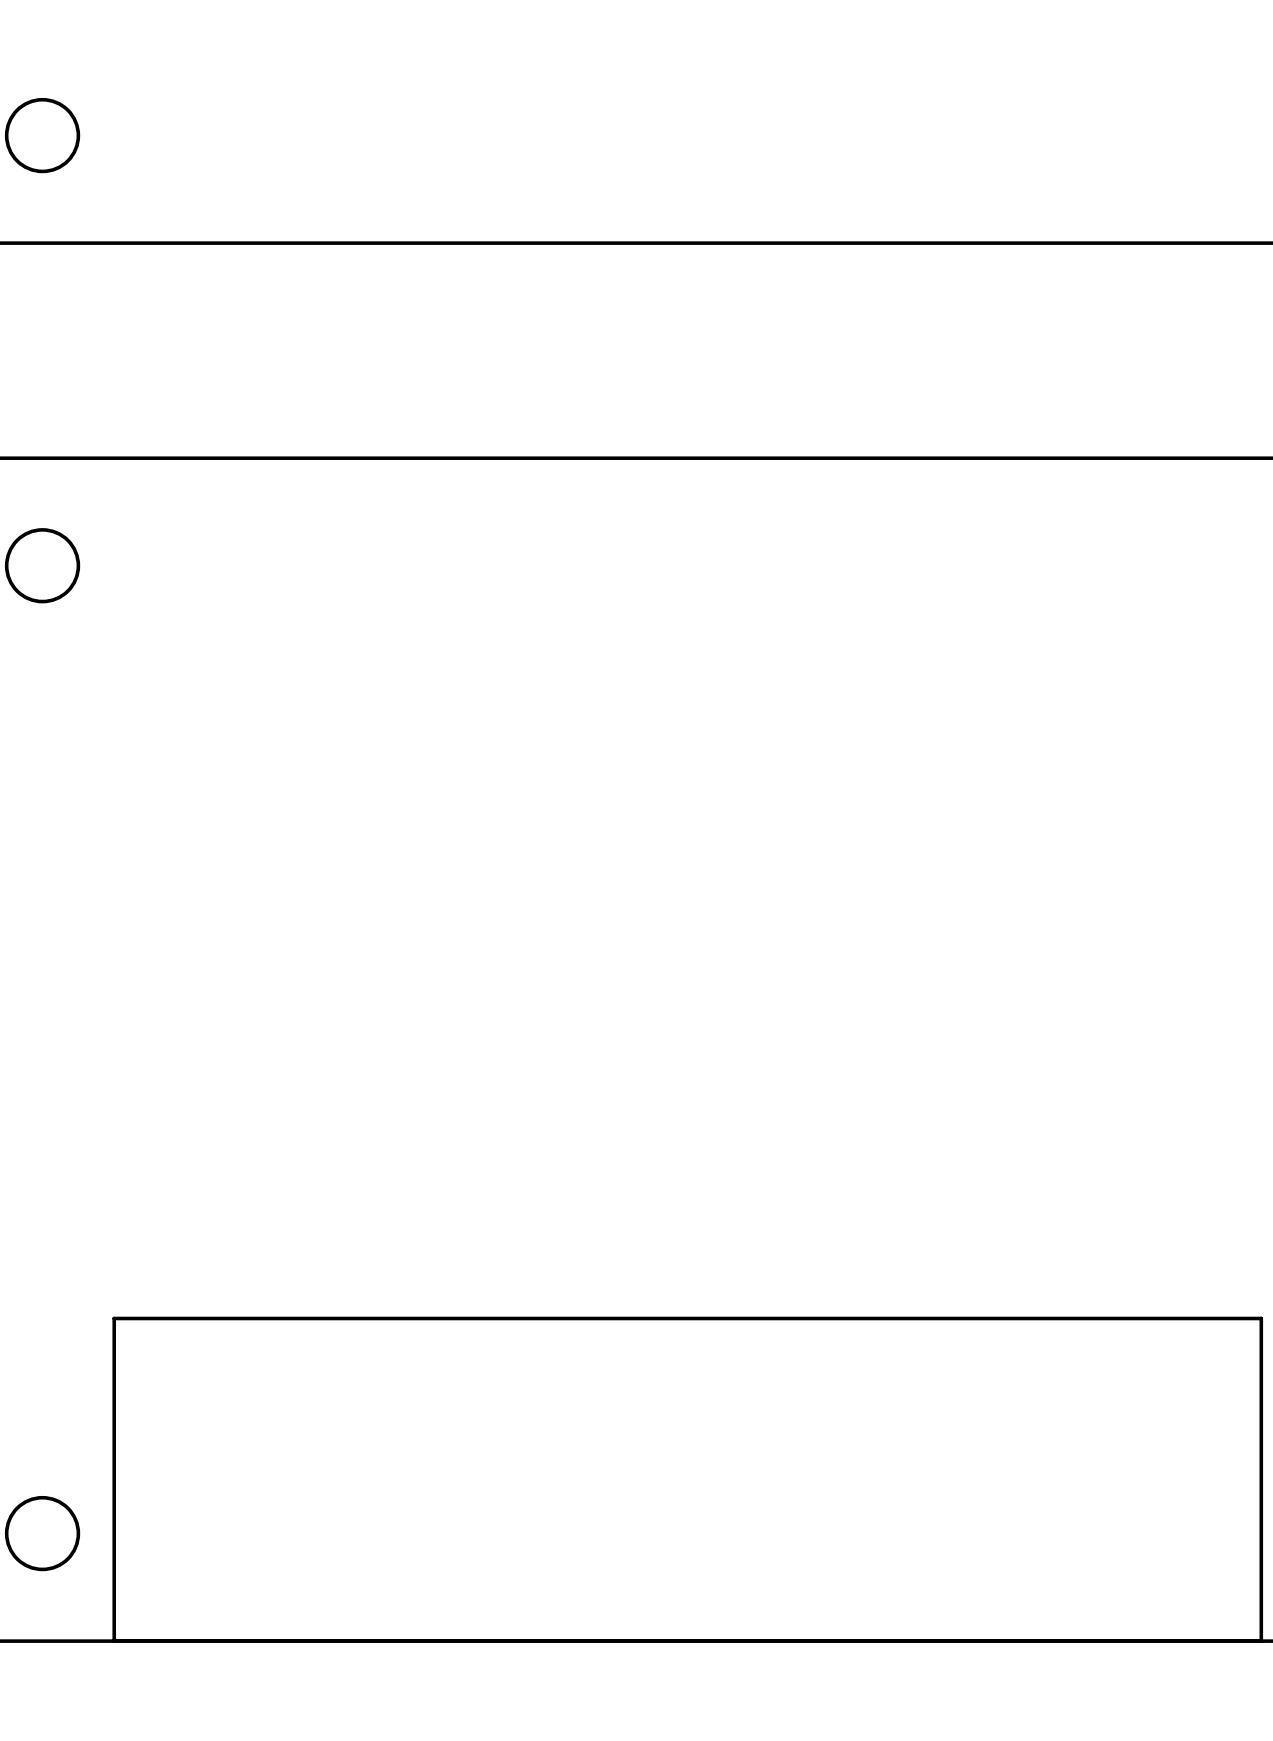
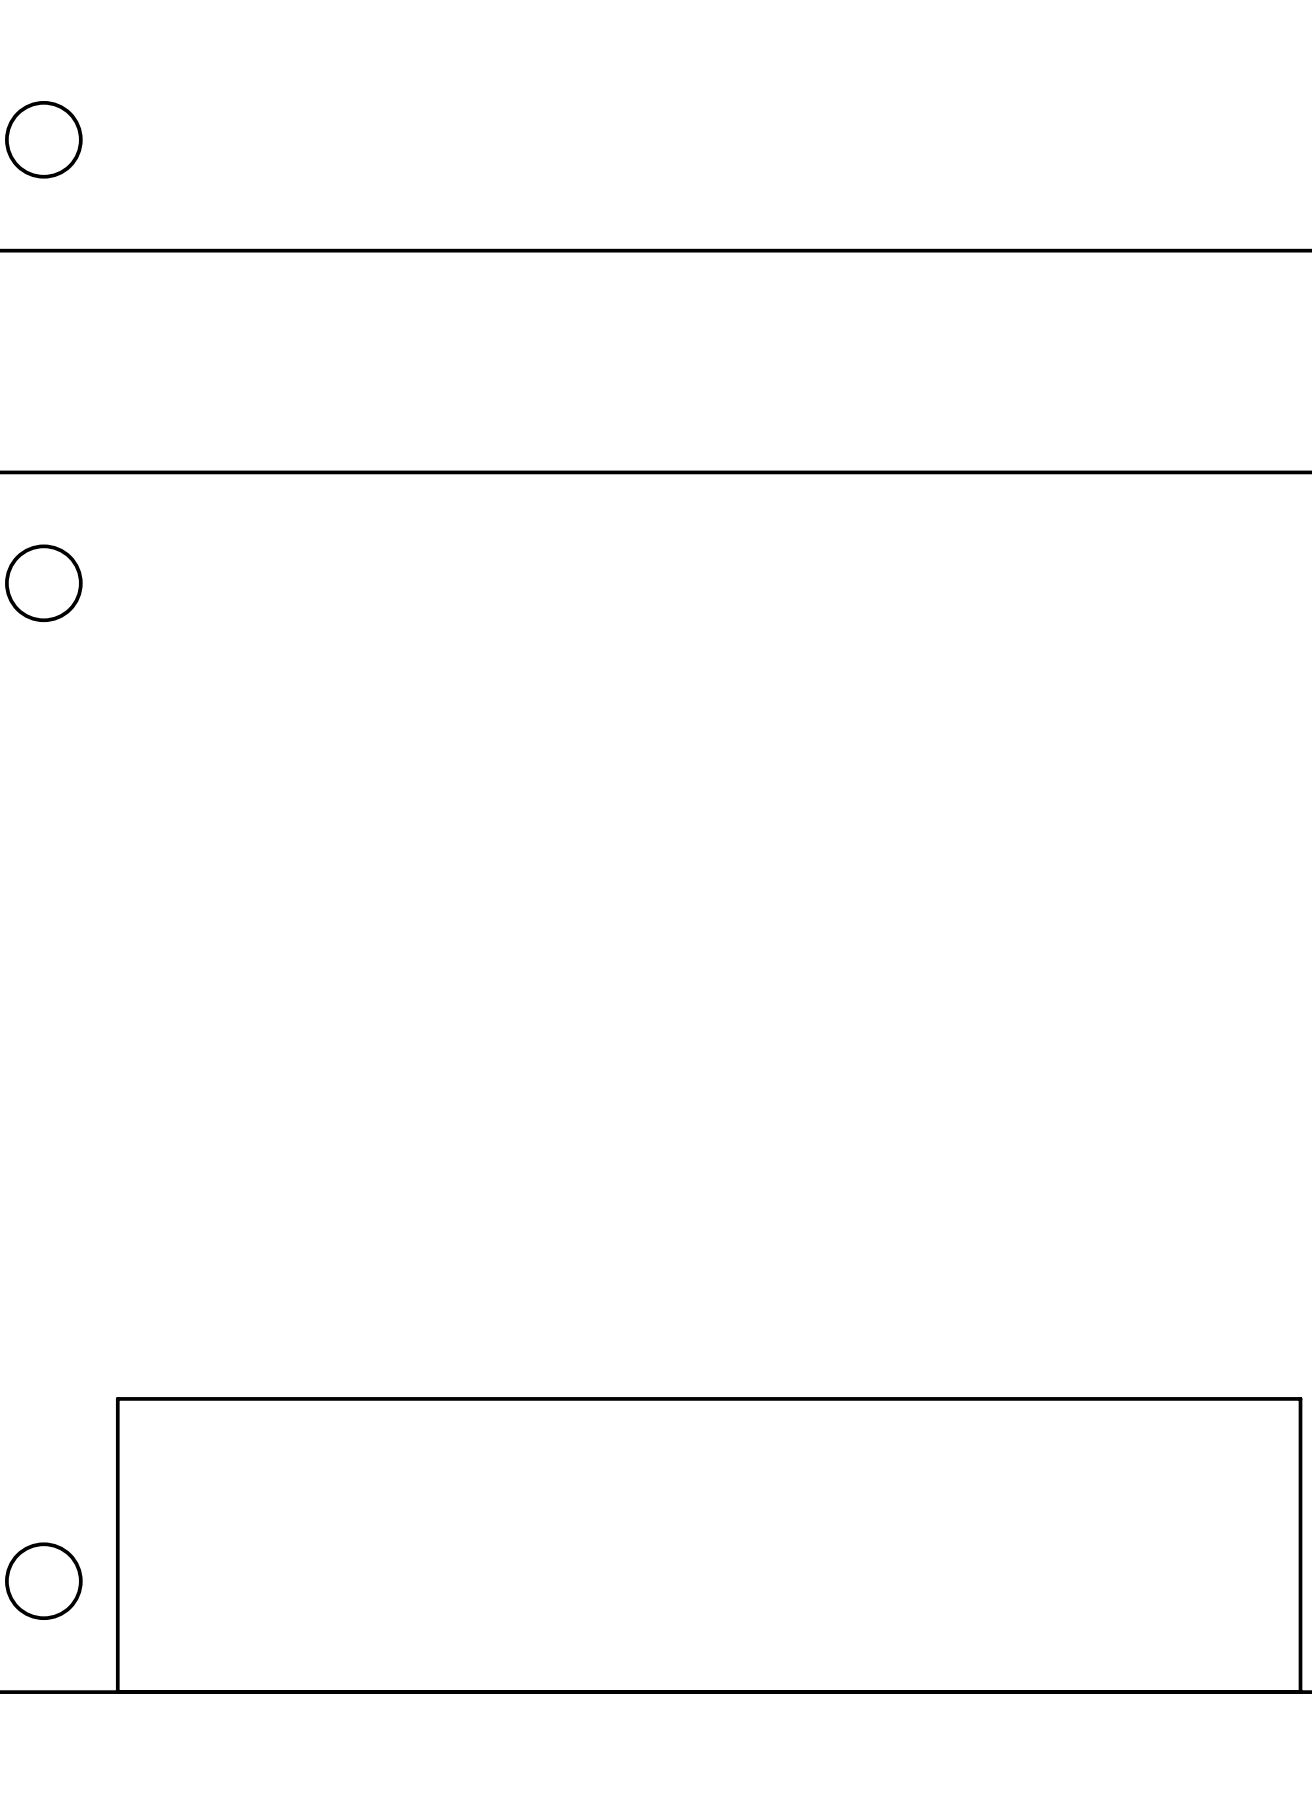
board edge: (1261, 1356) (1261, 1318) (114, 1318) (114, 1356) -> (1300, 1398) (117, 1398)

